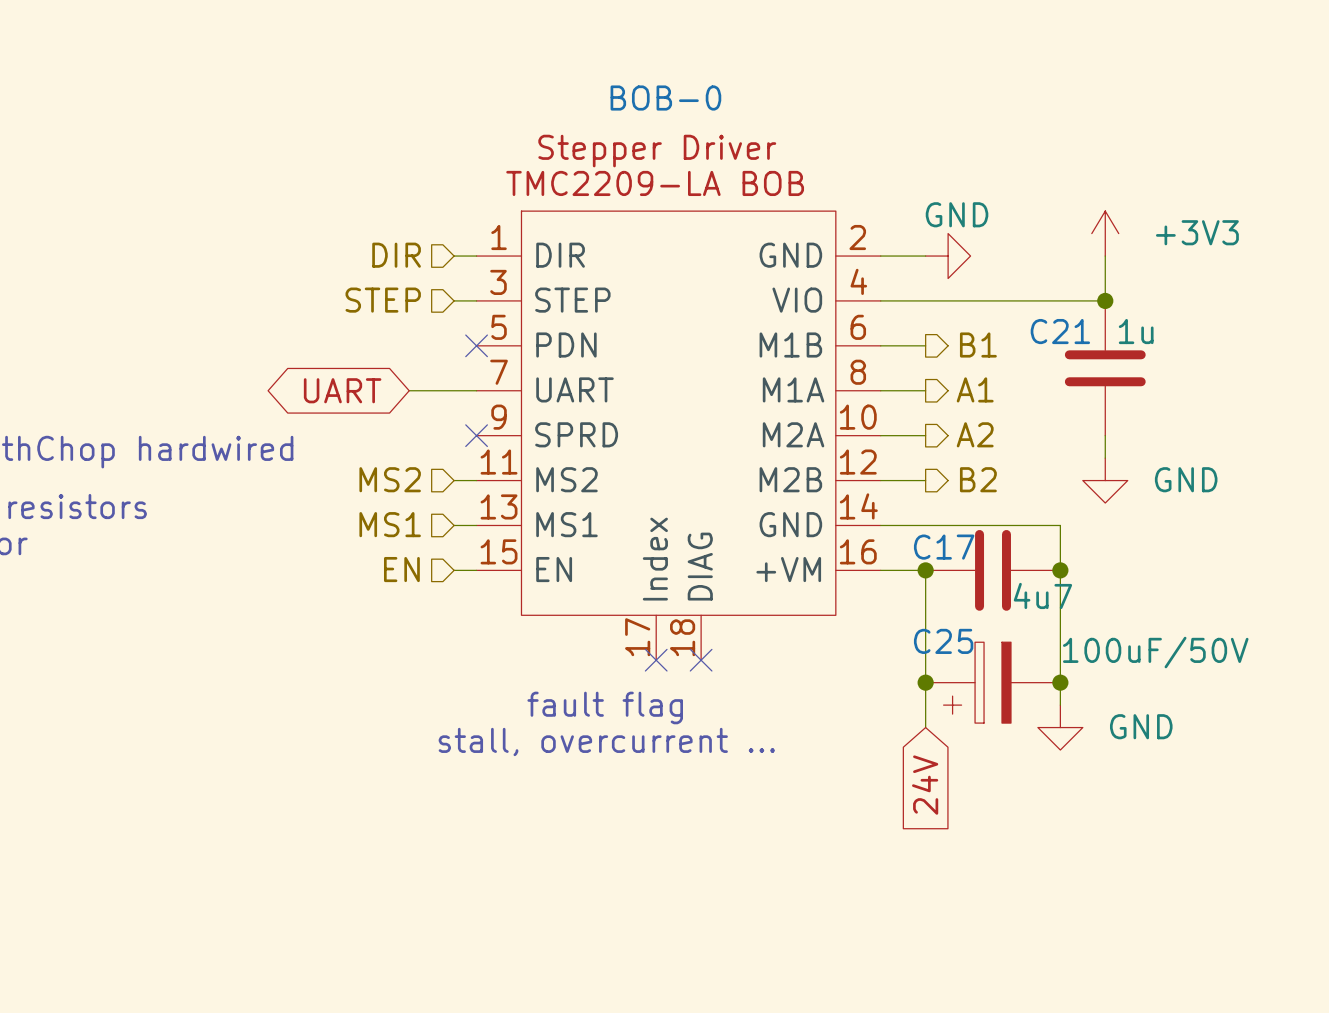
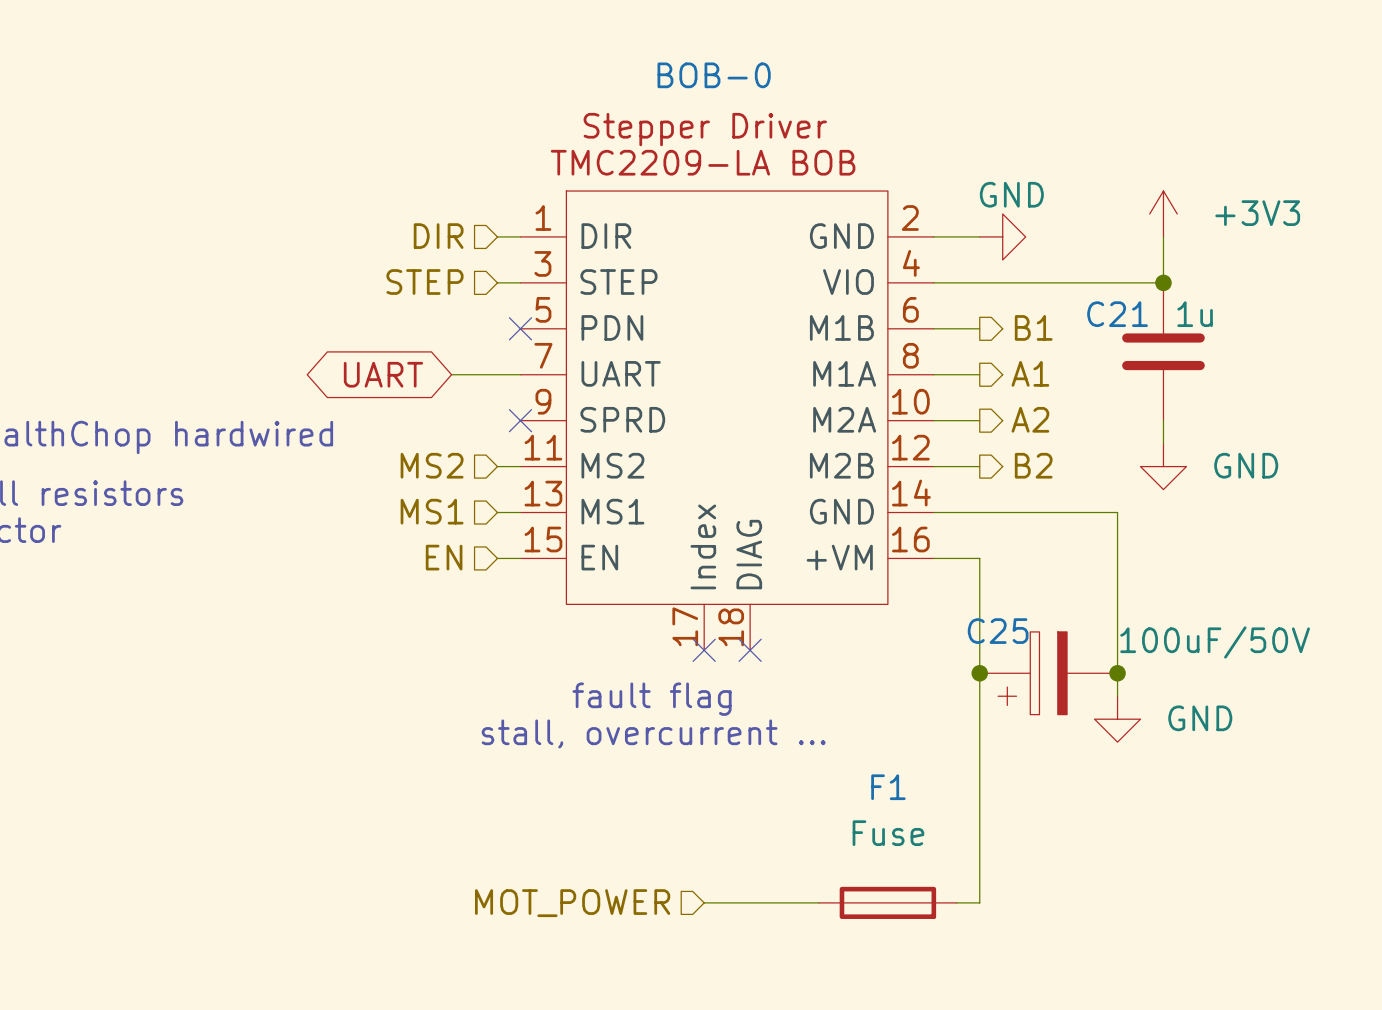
junction: (925, 570) -> none
C17: 4u7 (993, 570) -> none
junction: (1060, 570) -> none
wire: none -> (979, 719) (979, 902) (956, 902)
global label: 24V (925, 785) -> none
hierarchical label: none -> MOT_POWER (572, 903)
wire: none -> (704, 902) (819, 902)
F1: none -> Fuse (887, 902)

